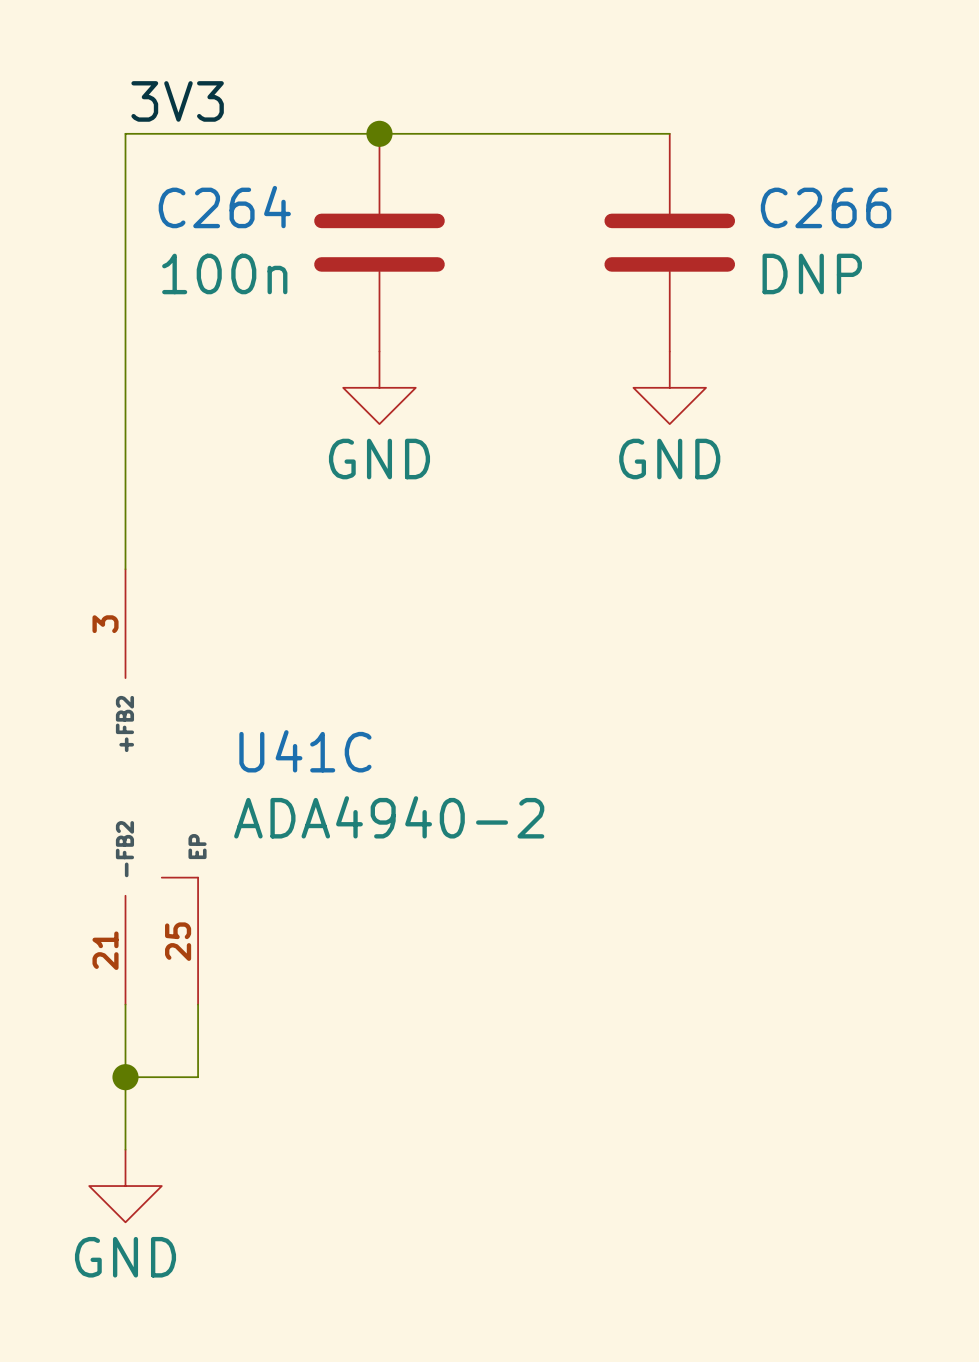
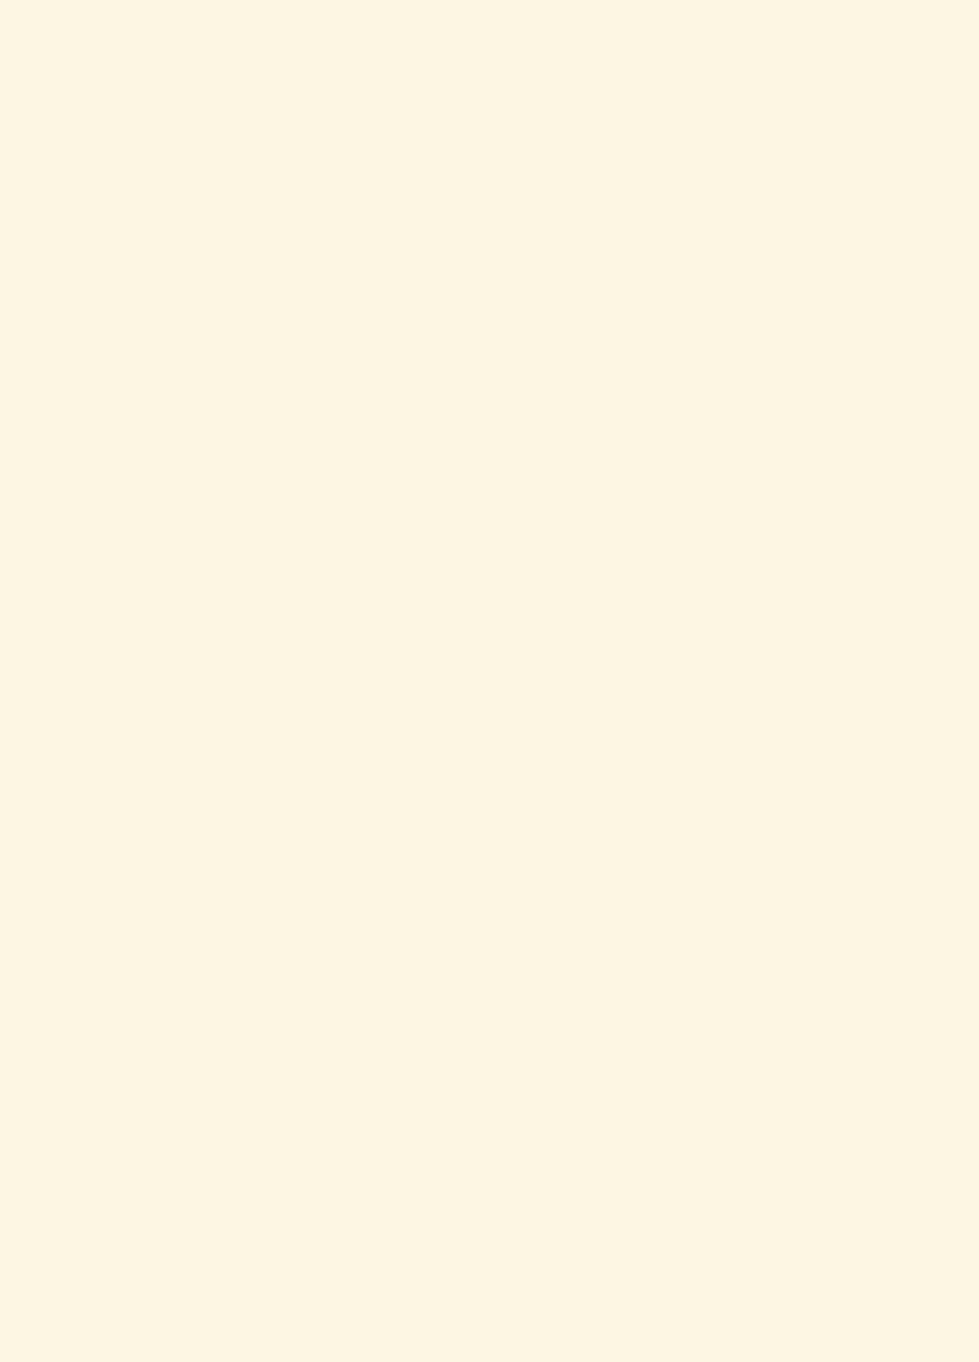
label: 3V3 (177, 101) -> none
junction: (379, 133) -> none
wire: (669, 133) (125, 133) (125, 569) -> none
C264: 100n (379, 242) -> none
C266: DNP (669, 242) -> none
power symbol: GND (379, 387) -> none
power symbol: GND (669, 387) -> none
U41C: ADA4940-2 (161, 786) -> none
wire: (125, 1004) (125, 1149) -> none
wire: (198, 1004) (198, 1077) (125, 1077) -> none
junction: (125, 1077) -> none
power symbol: GND (125, 1186) -> none

